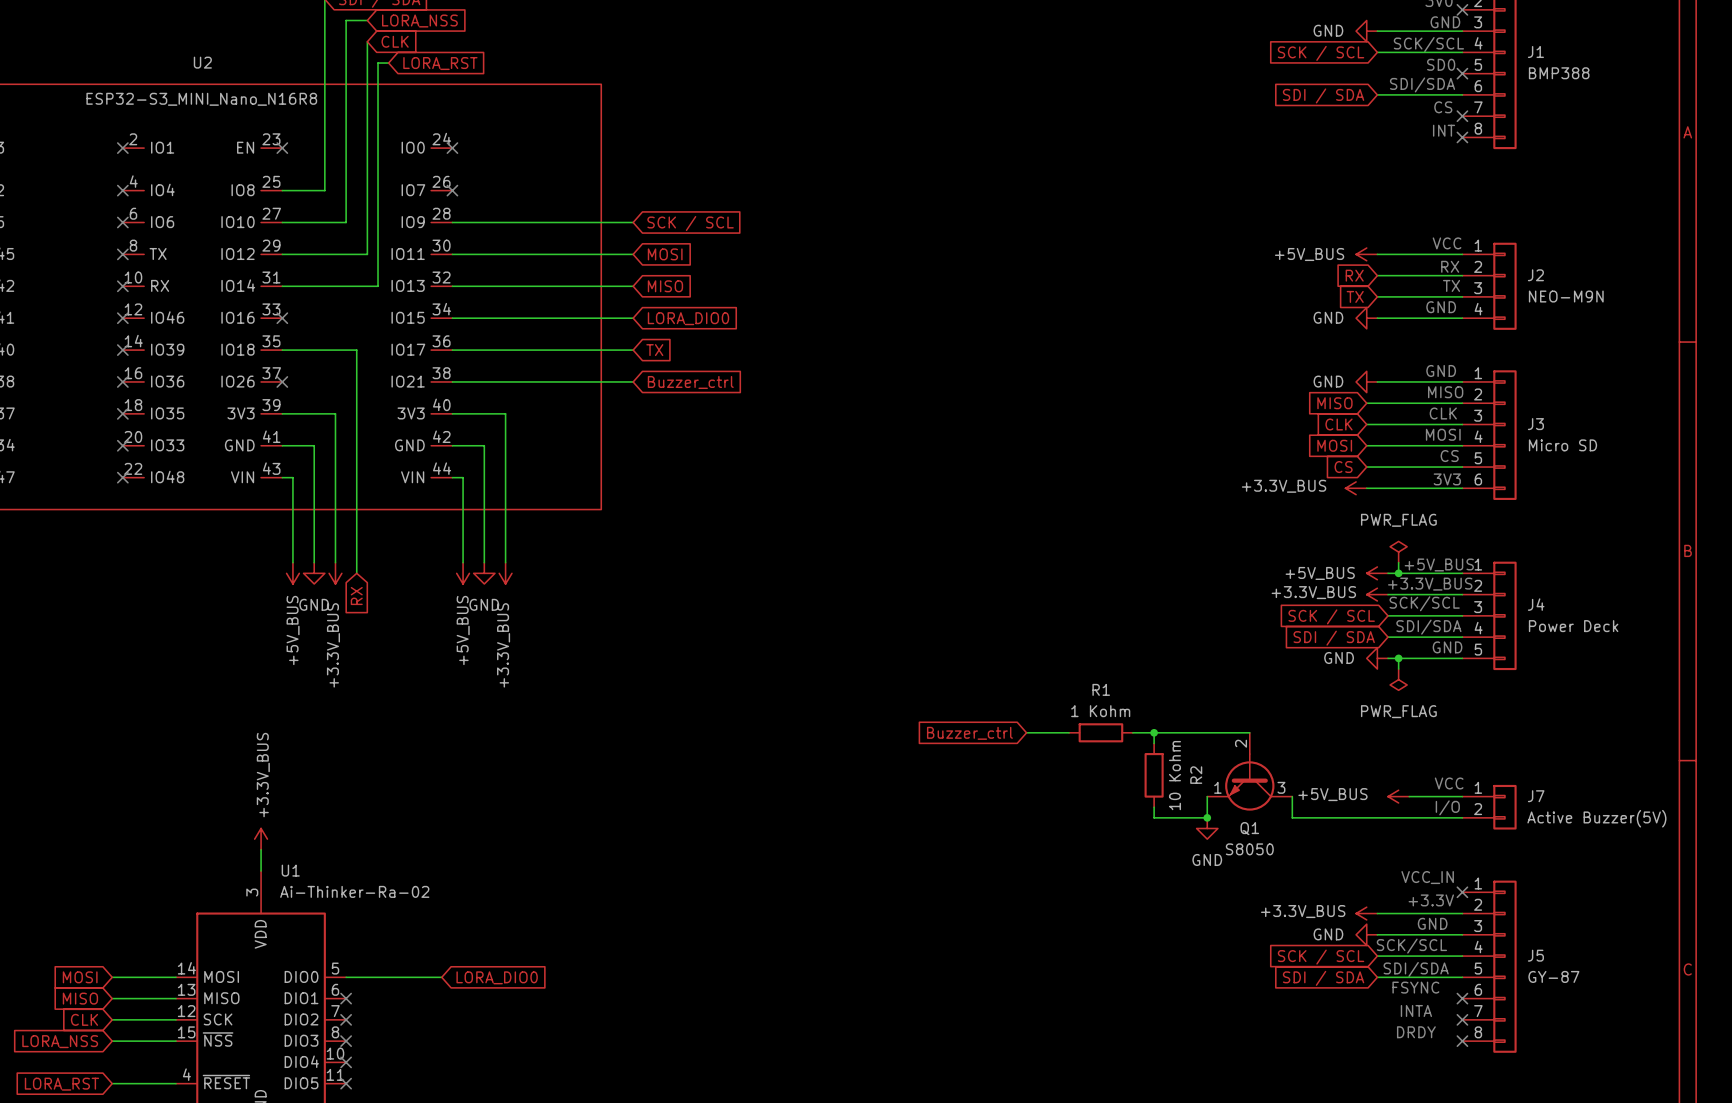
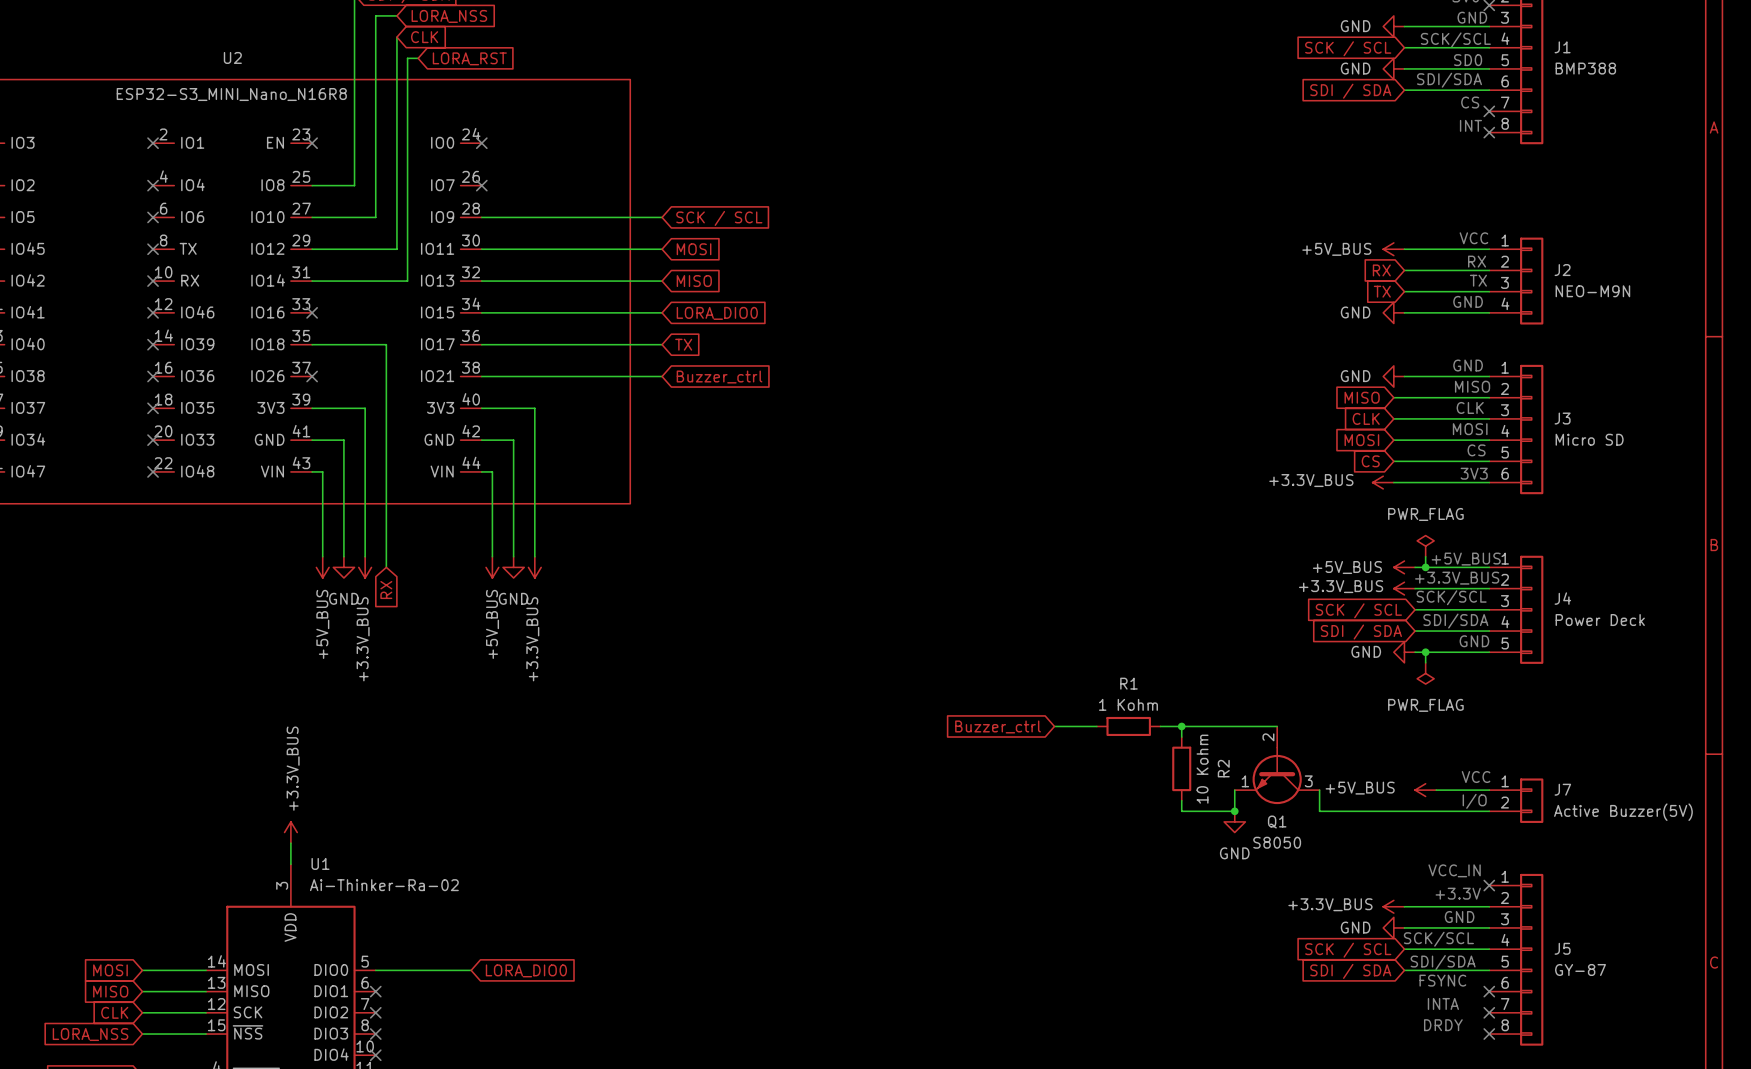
power symbol: none -> GND (1393, 68)
wire: none -> (1404, 68) (1489, 68)
no-connect mark: (1462, 73) -> none

